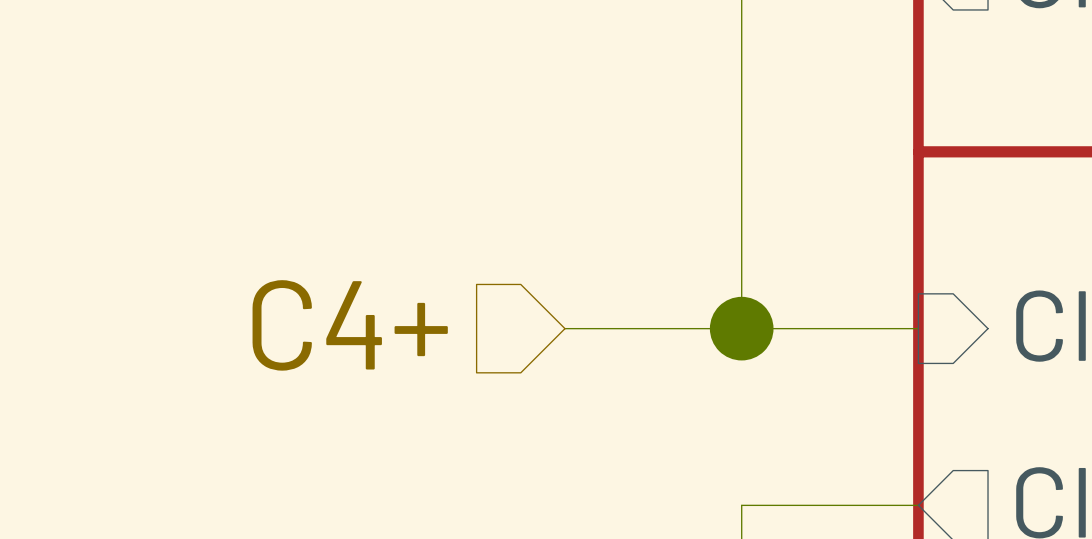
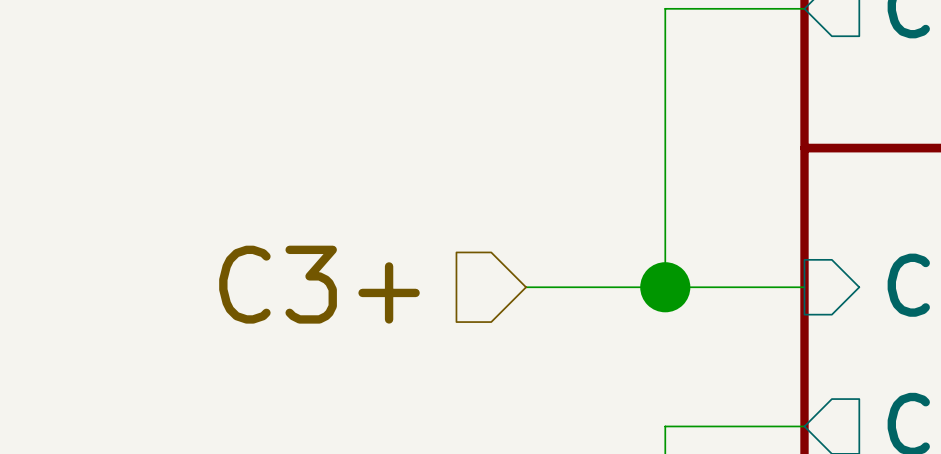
hierarchical label: C4+ (350, 325) -> C3+ (319, 284)

